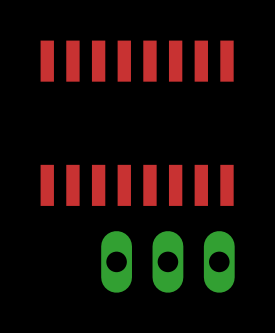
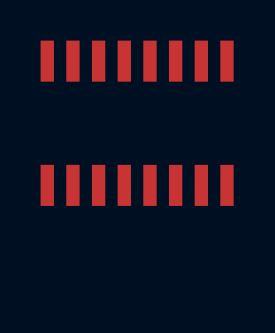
part: (167, 261) -> none

